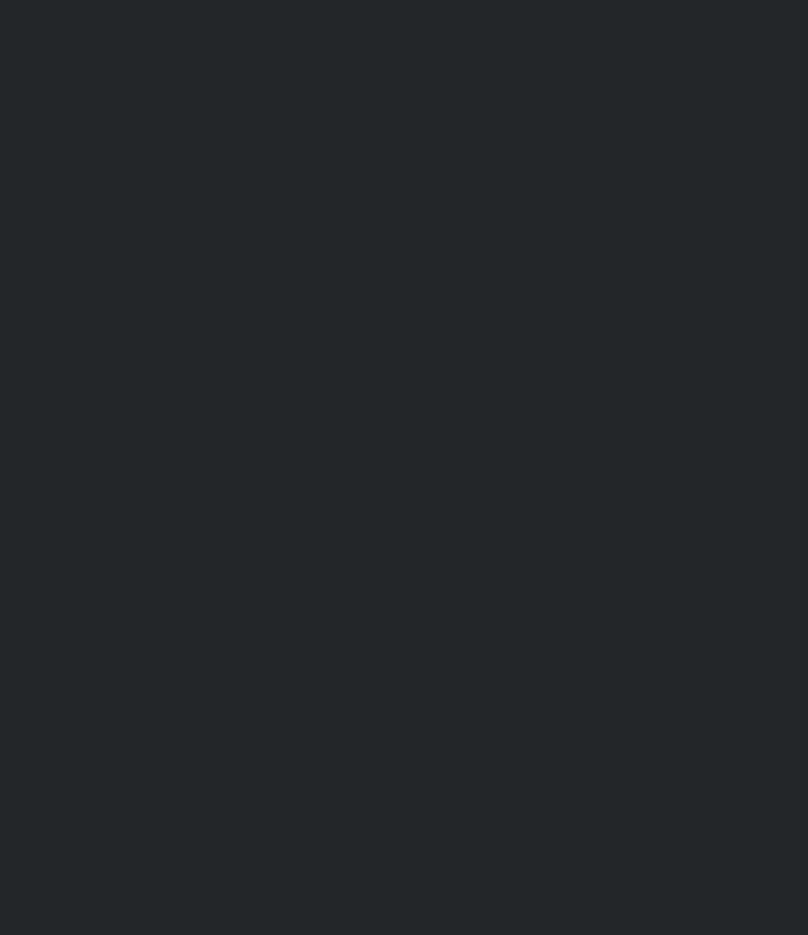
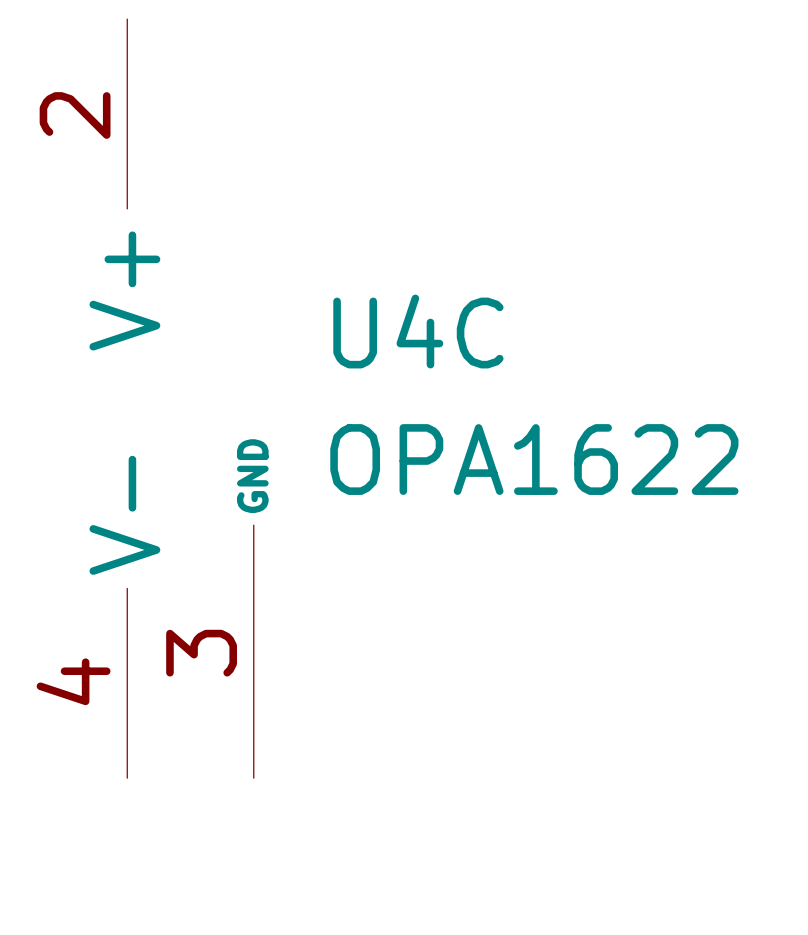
U4C: none -> OPA1622 (190, 398)

